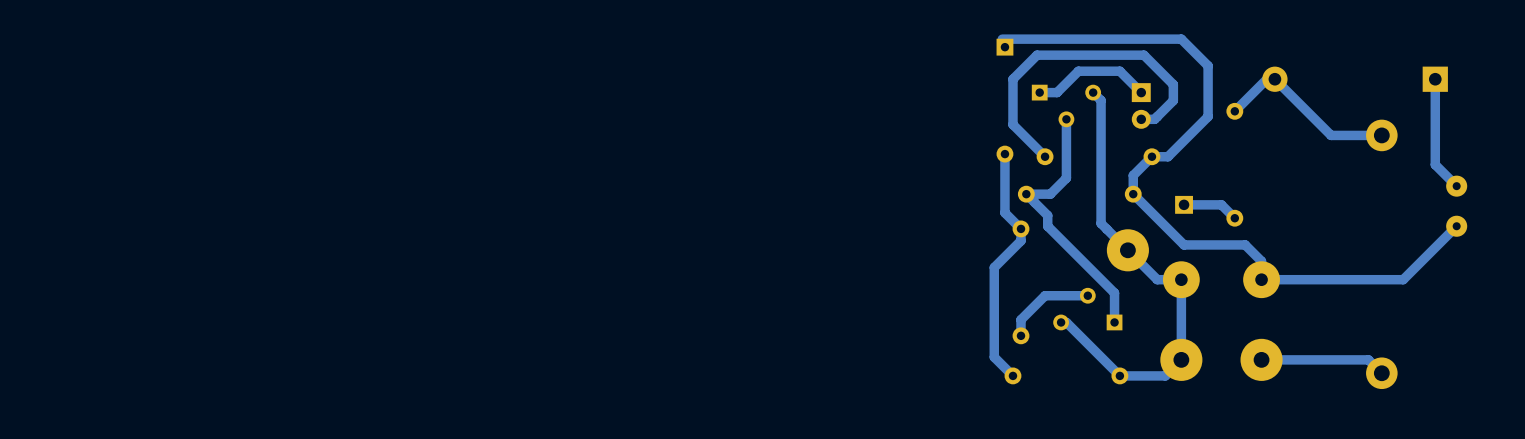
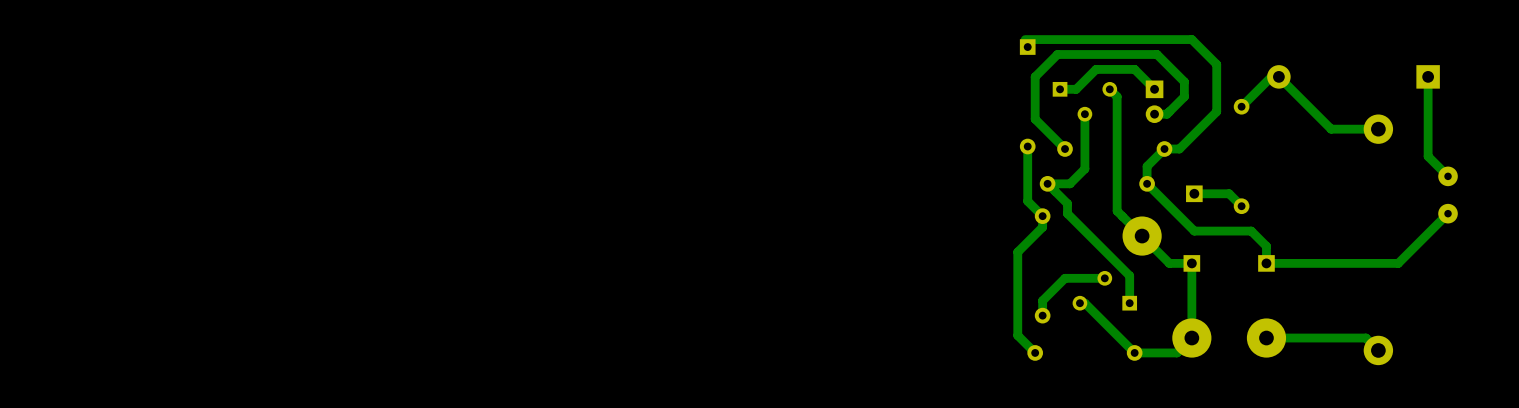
part footprint: [1162, 261, 1200, 299] -> [1183, 255, 1201, 272]
part footprint: [1243, 261, 1280, 299] -> [1258, 255, 1275, 272]

